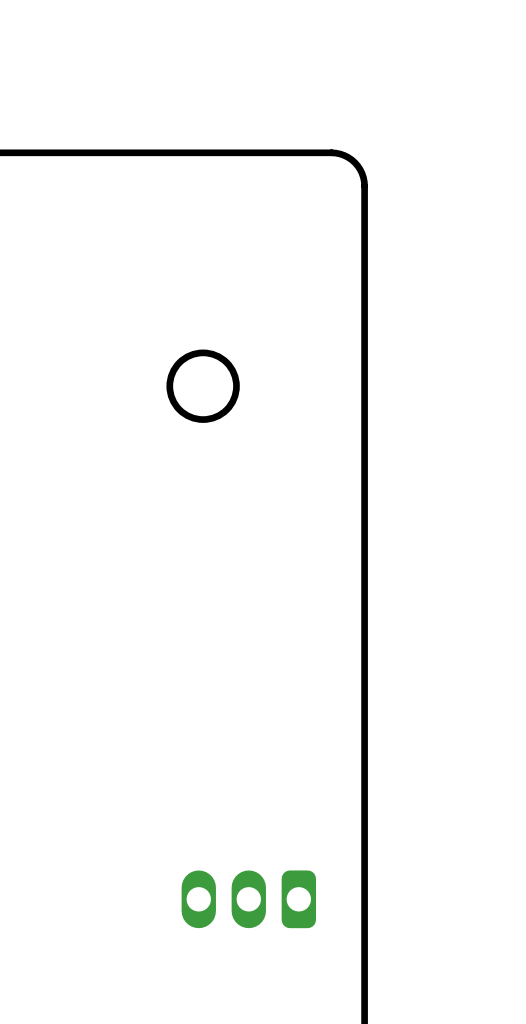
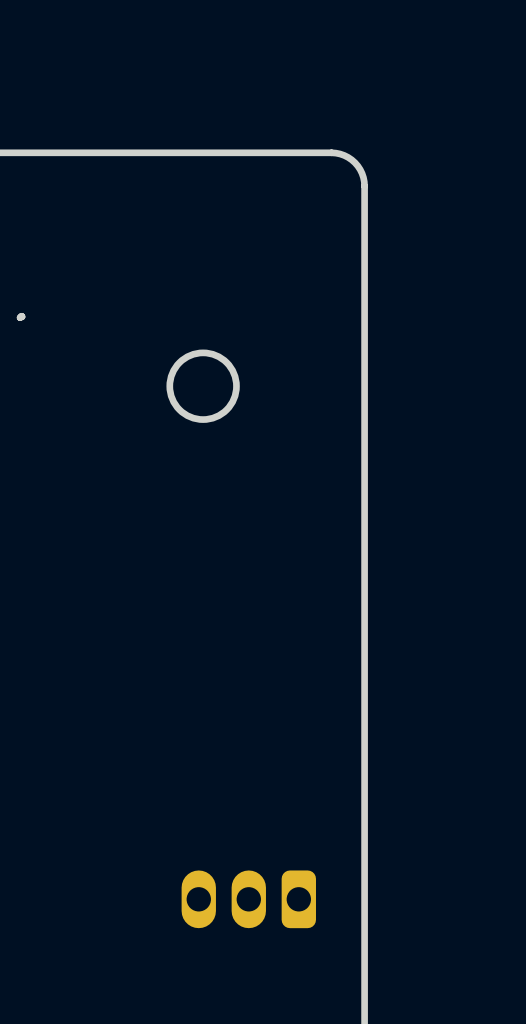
board edge: none -> (21, 316) (22, 316) (20, 317) (21, 316)

